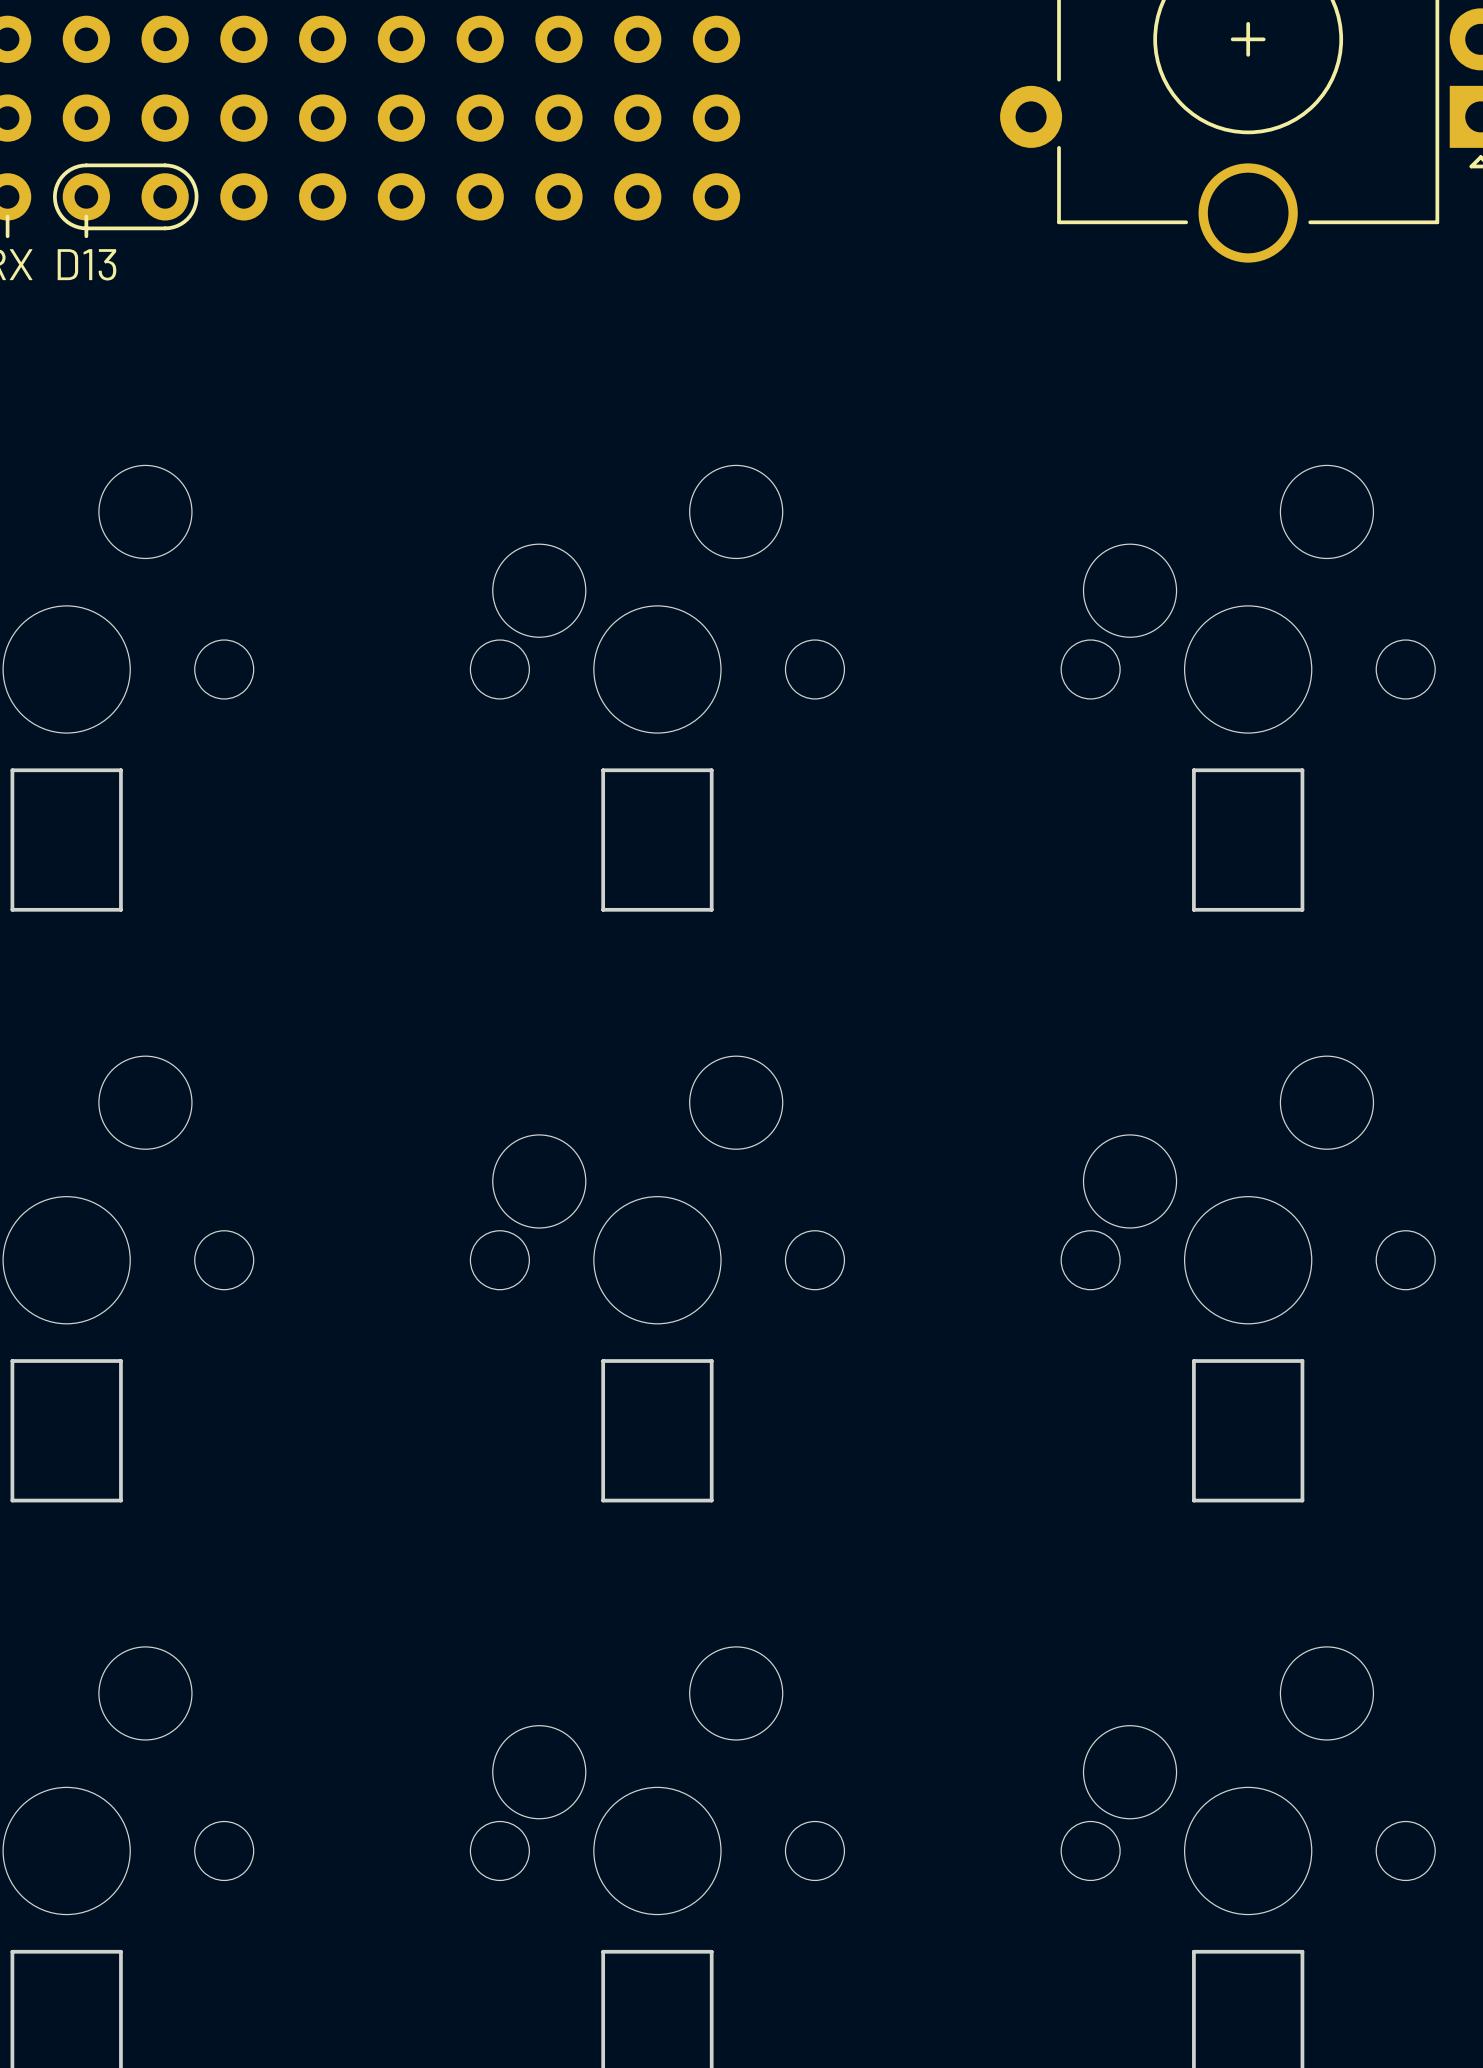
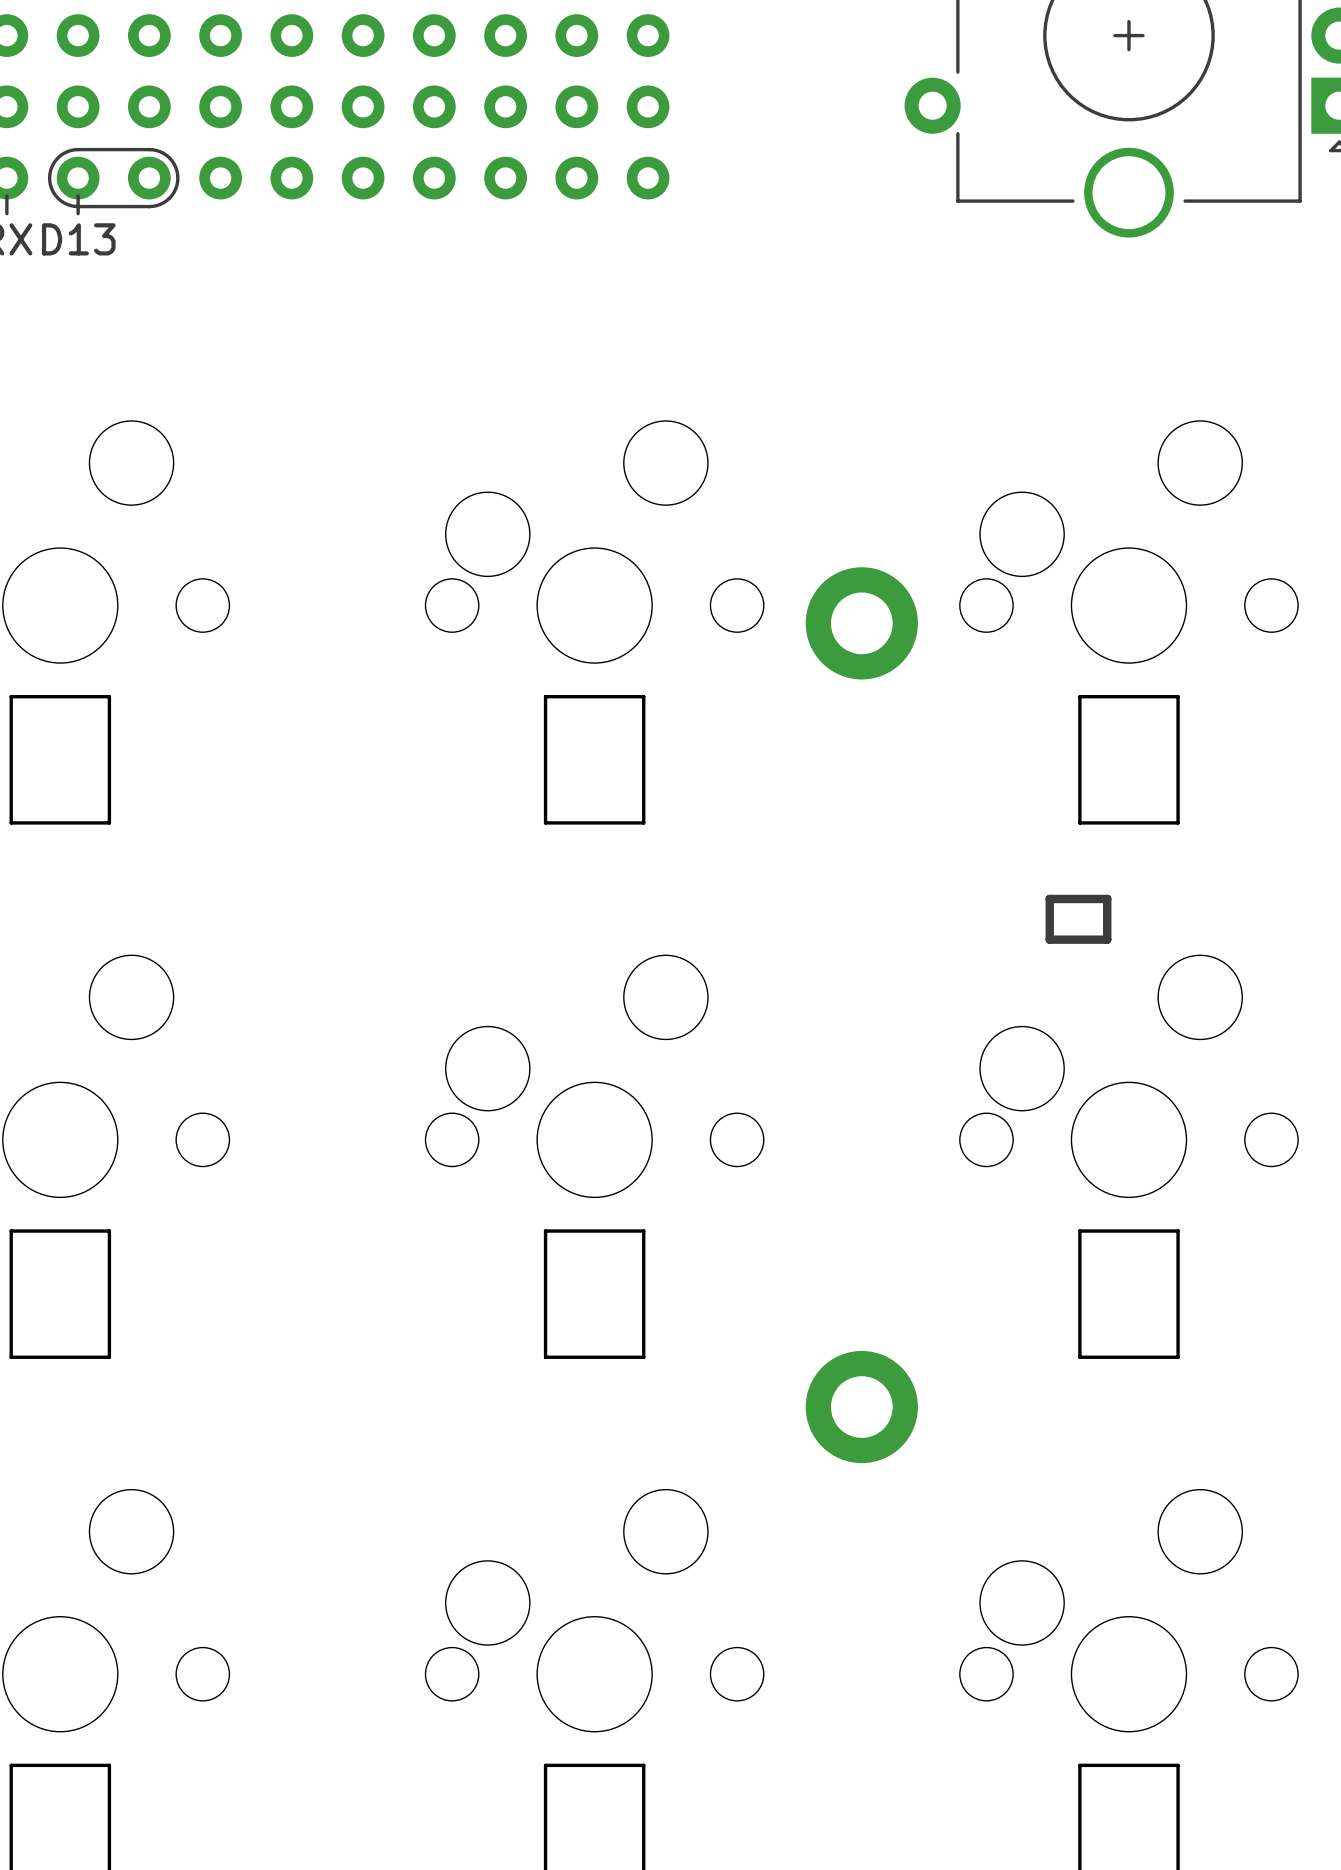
part: none -> (861, 623)
part: none -> (1078, 919)
part: none -> (861, 1407)

